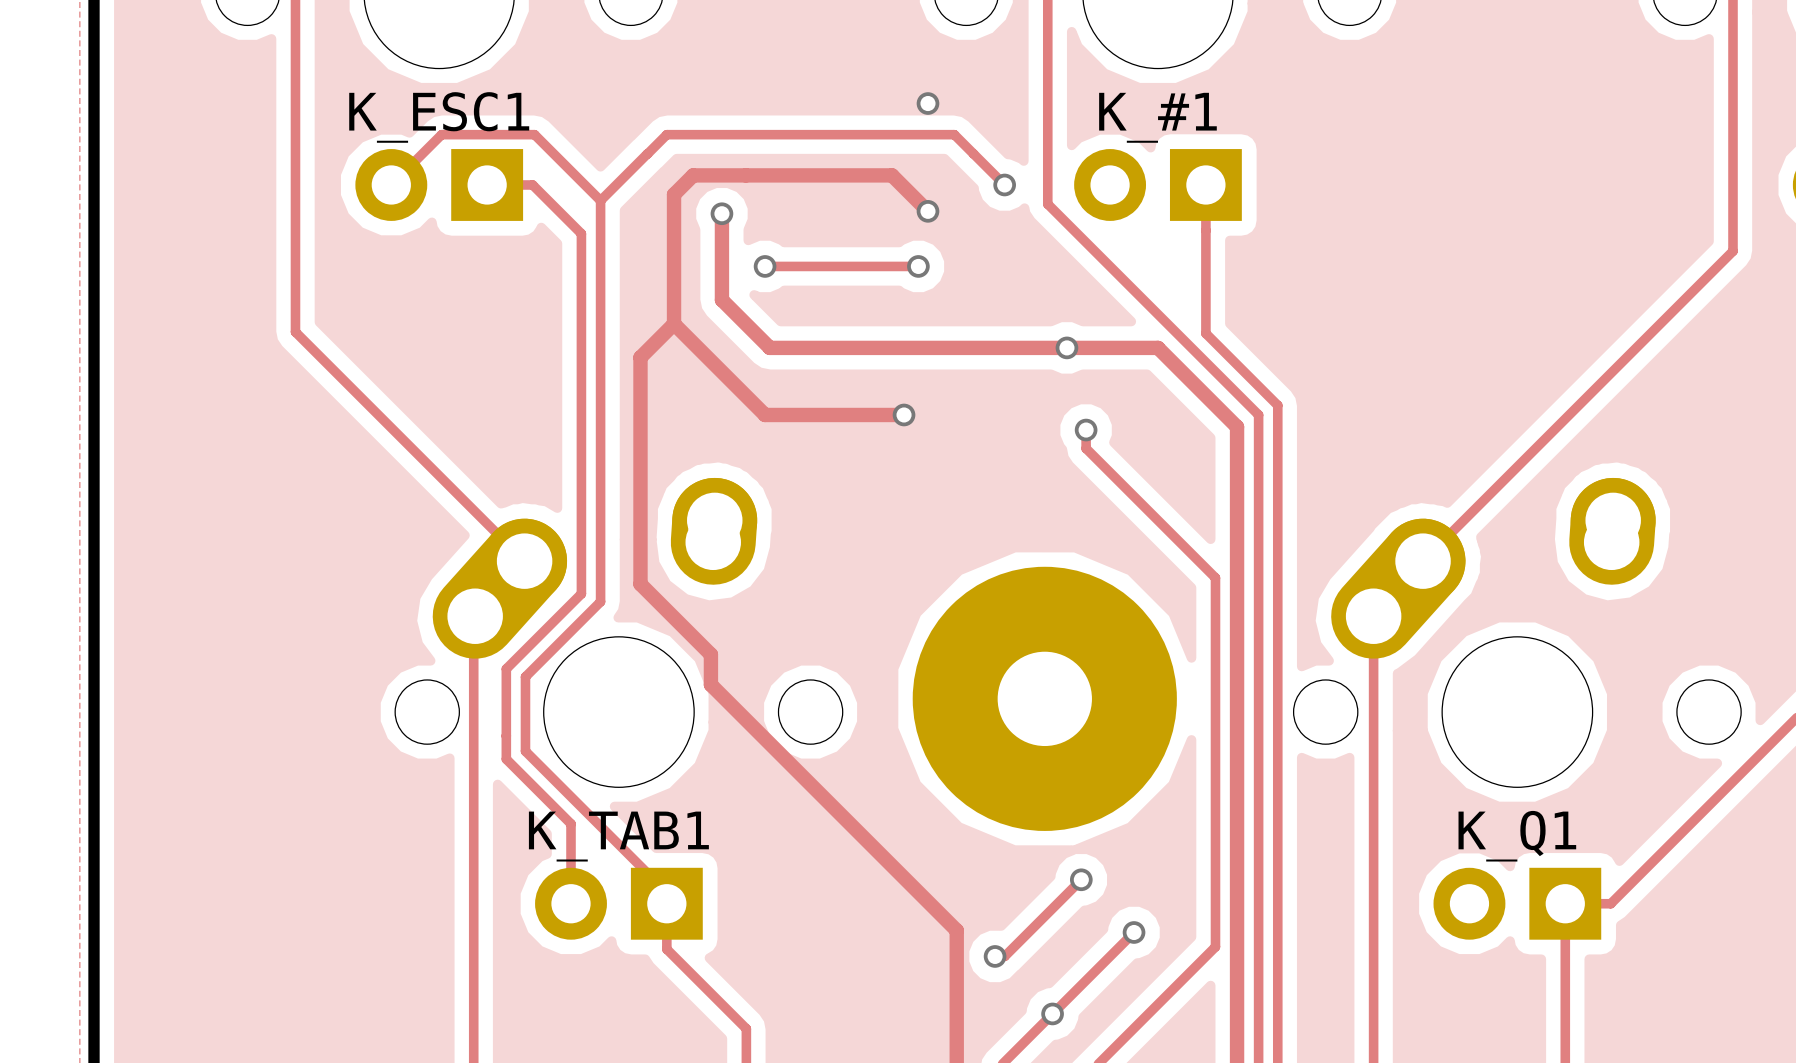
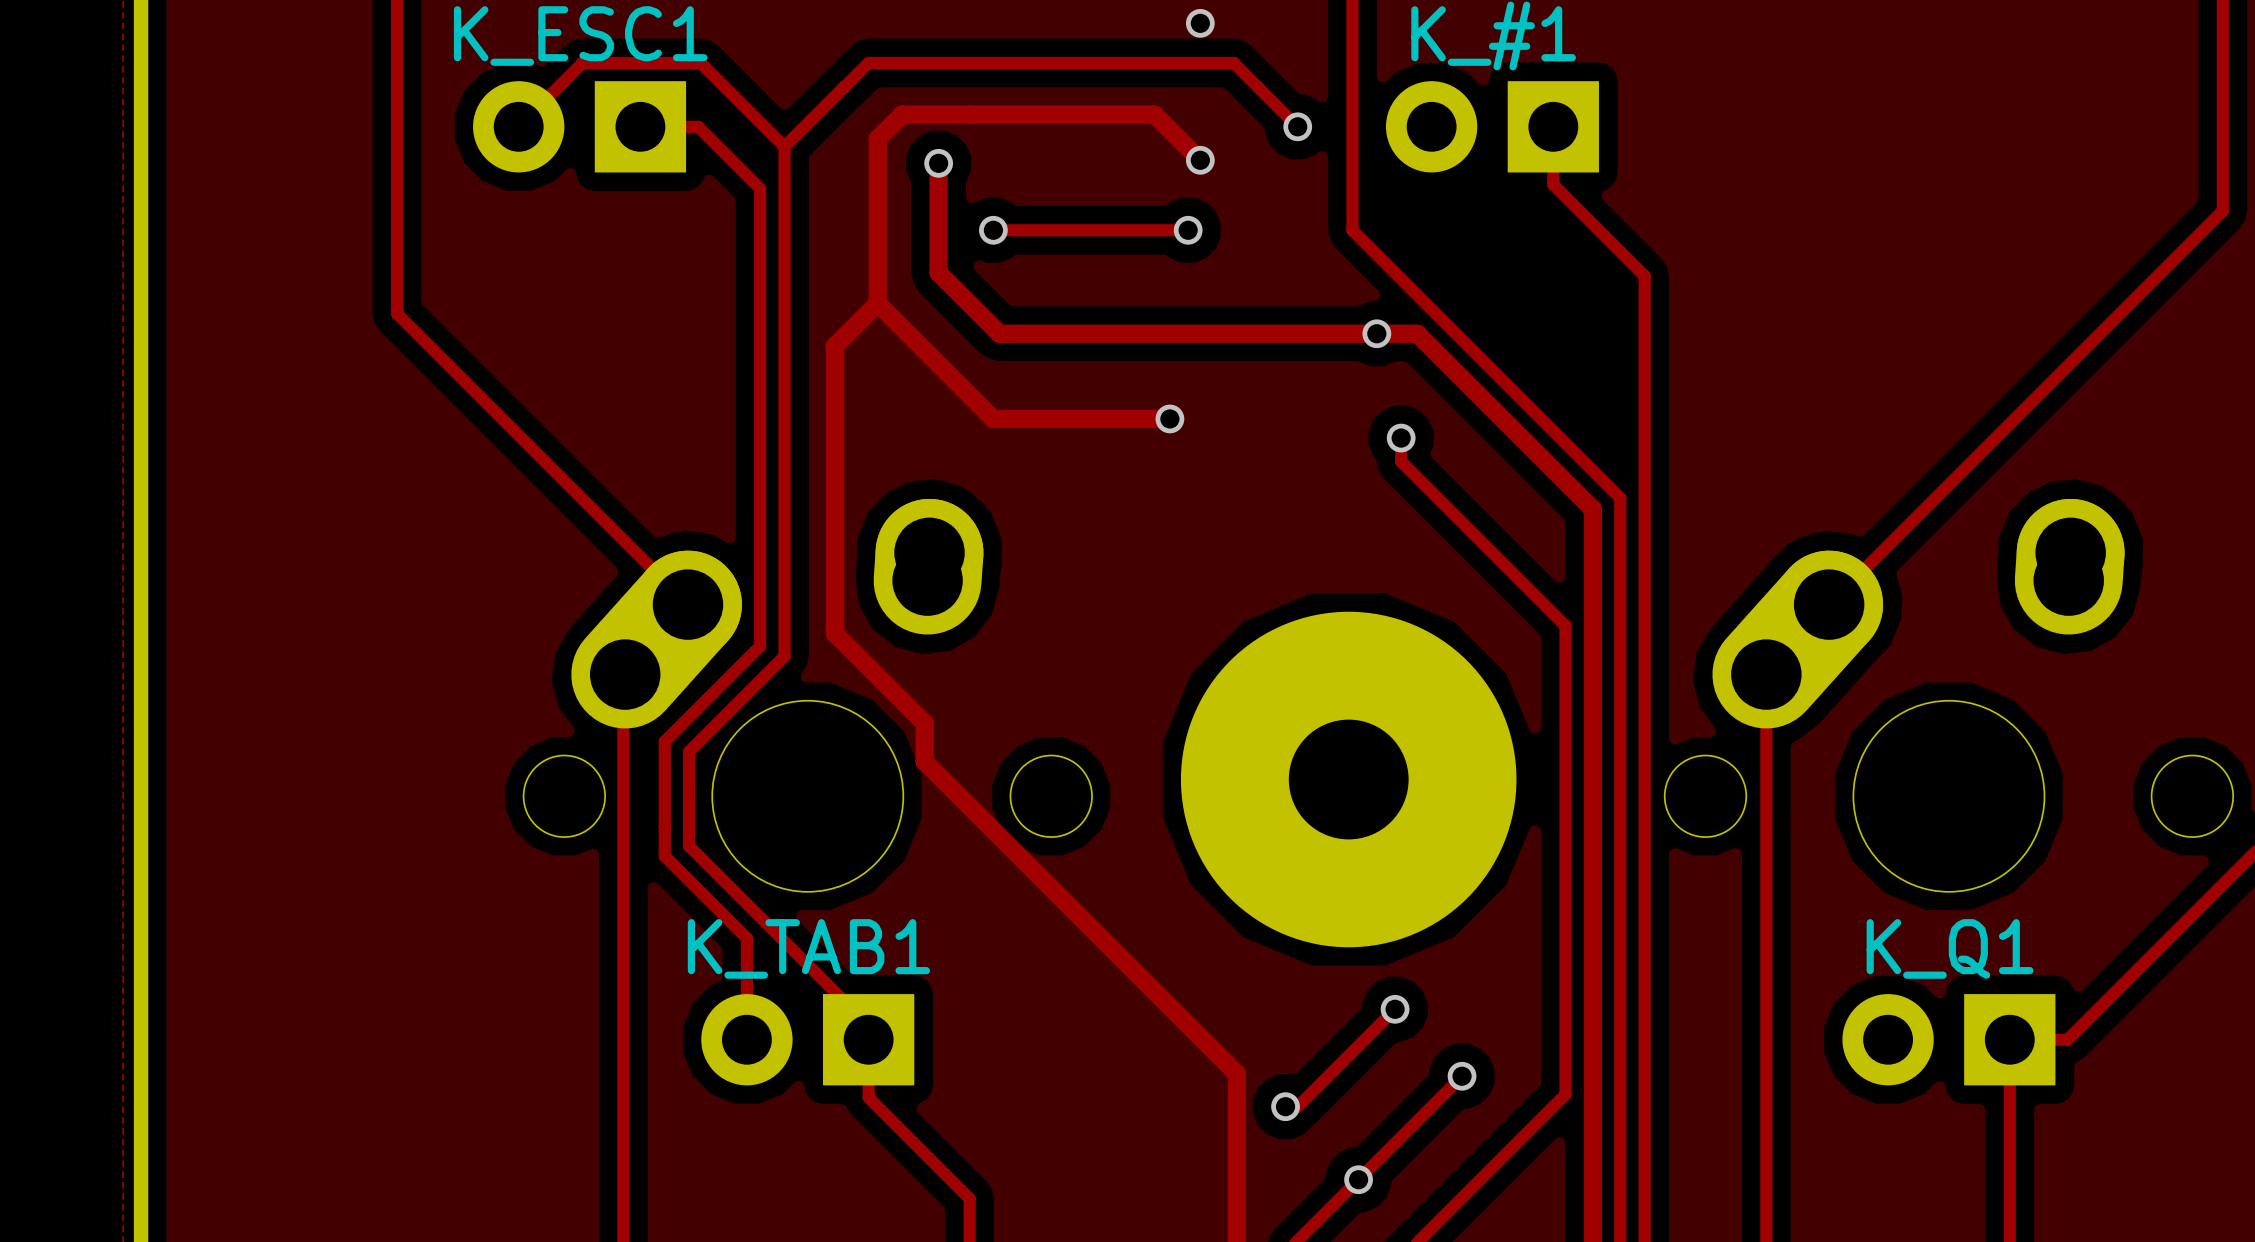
track: (1047, 204) (1258, 414) (1258, 477) -> (1352, 151) (1352, 230) (1620, 498)
track: (1205, 230) (1205, 333) (1277, 405) -> (1553, 184) (1644, 275) (1644, 406)
track: (1098, 347) (1157, 347) (1237, 426) (1237, 486) -> (1417, 333) (1592, 509)

